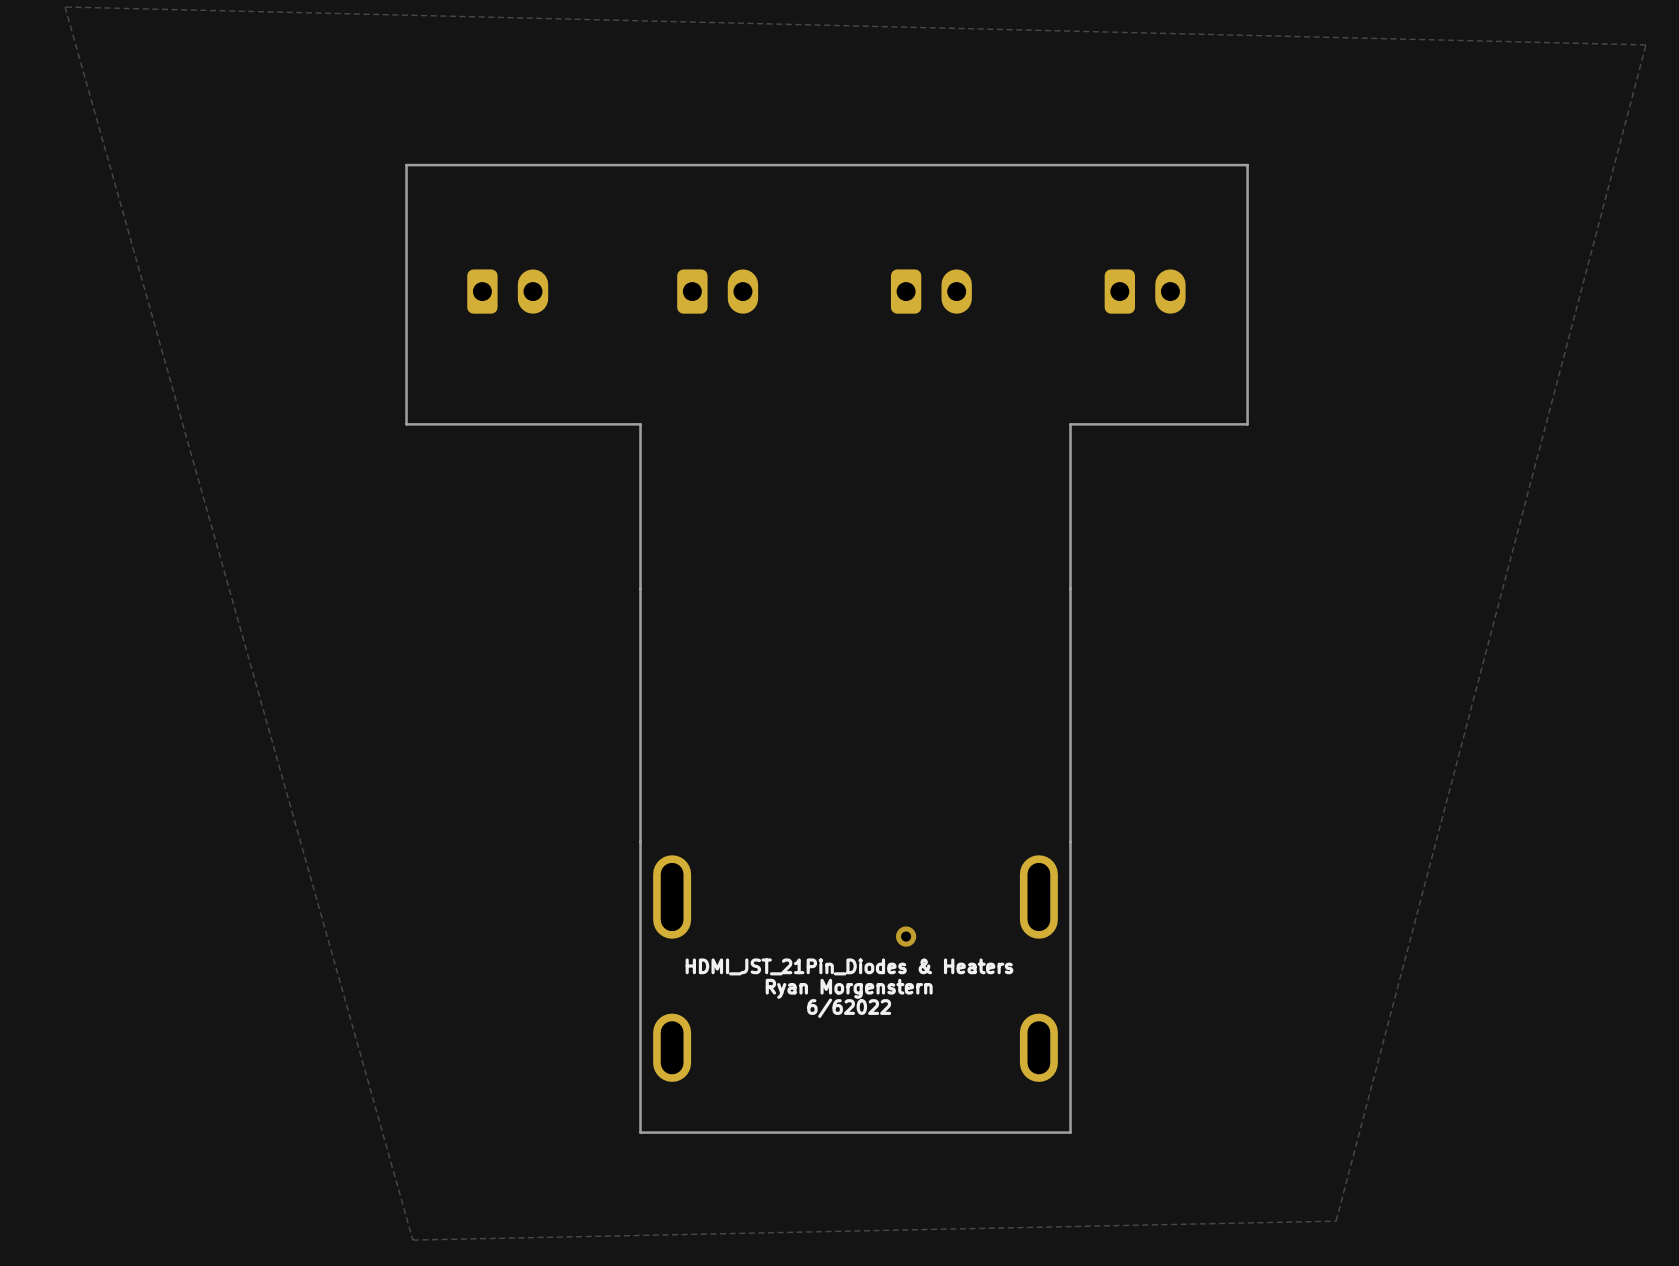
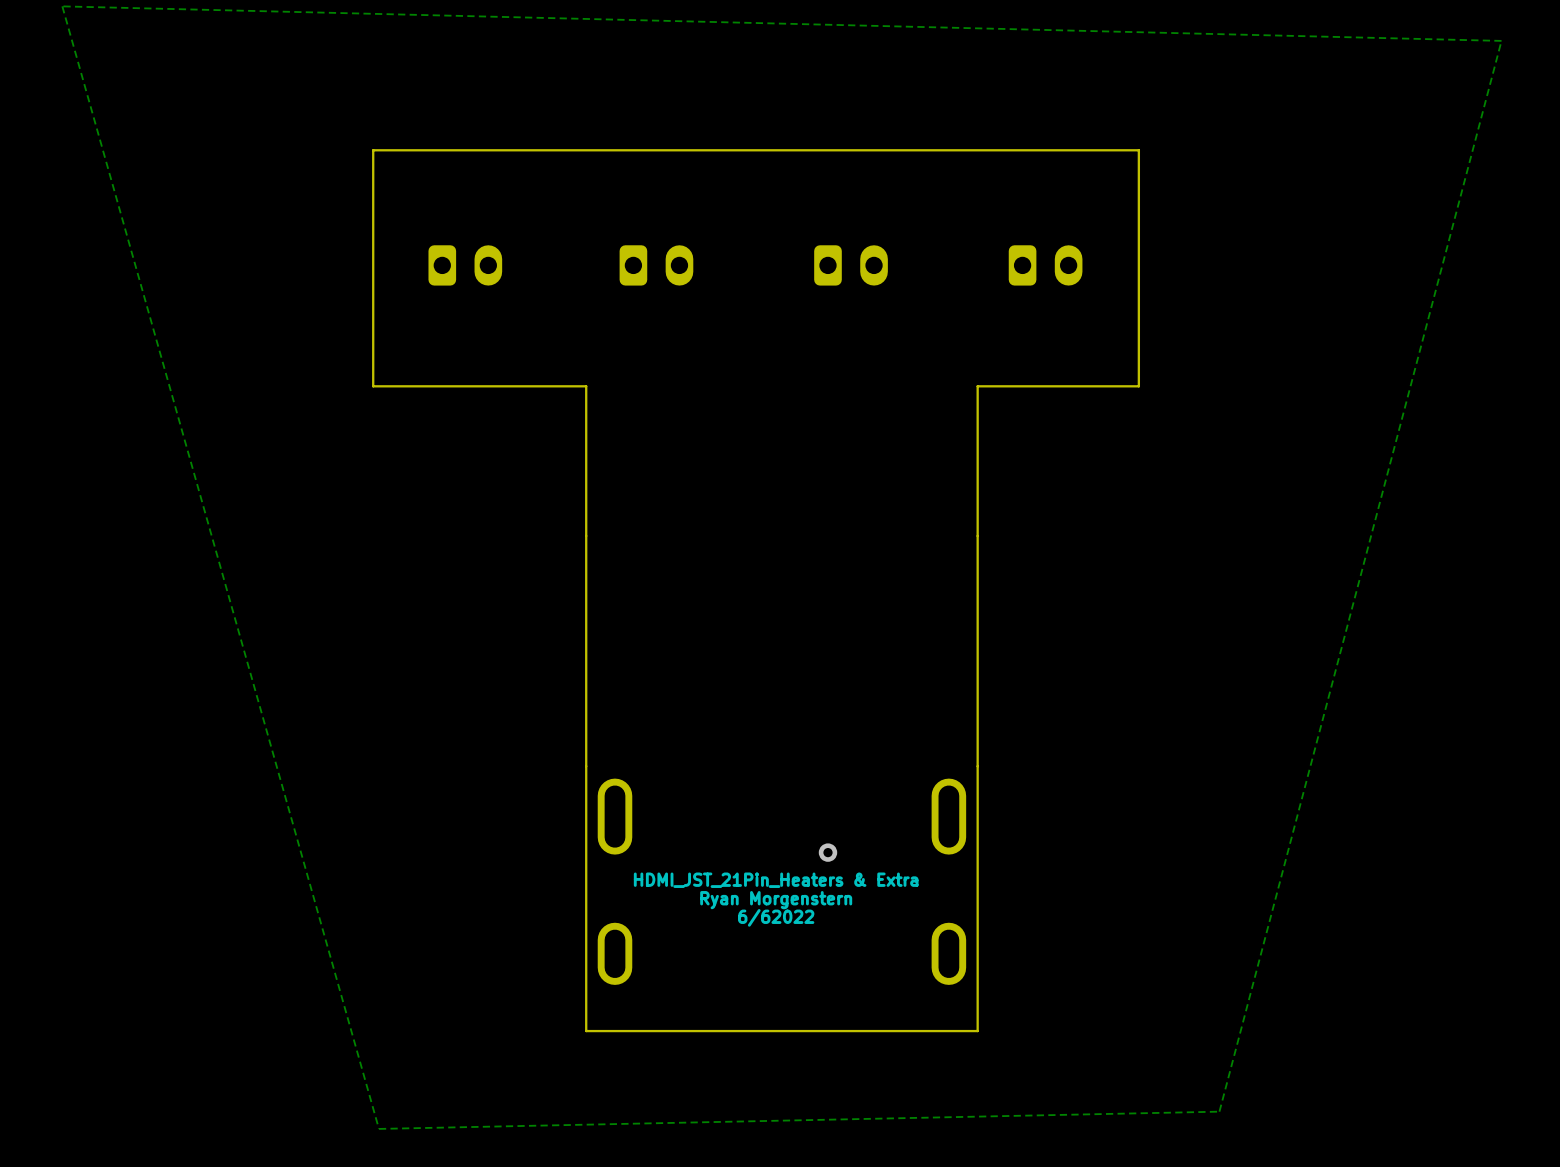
text: HDMI_JST_21Pin_Diodes & Heaters (849, 966) -> HDMI_JST_21Pin_Heaters & Extra (776, 880)

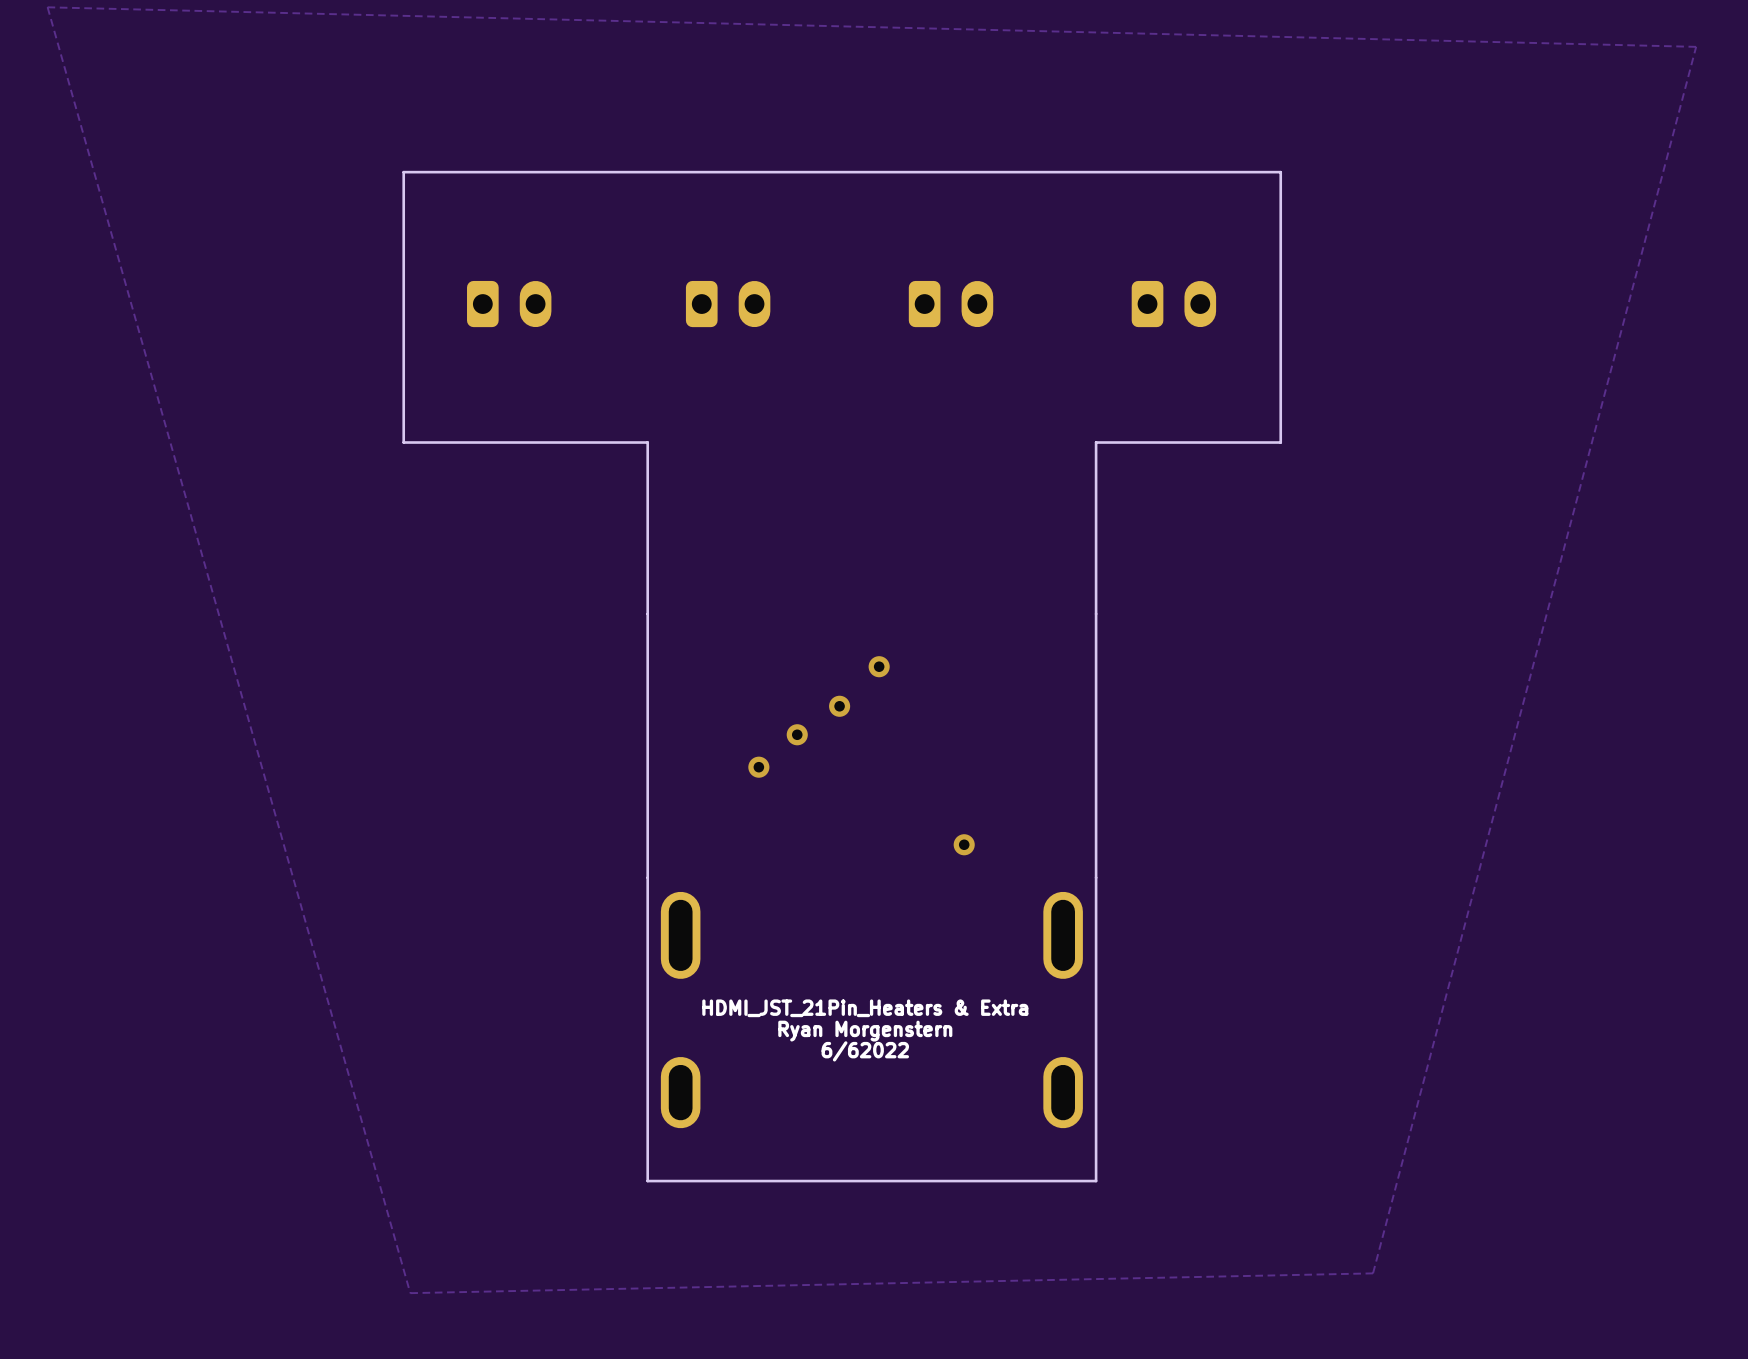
via: none -> (879, 666)
via: none -> (839, 706)
via: none -> (797, 734)
via: none -> (758, 767)
via: none -> (964, 844)
via: (827, 852) -> none

